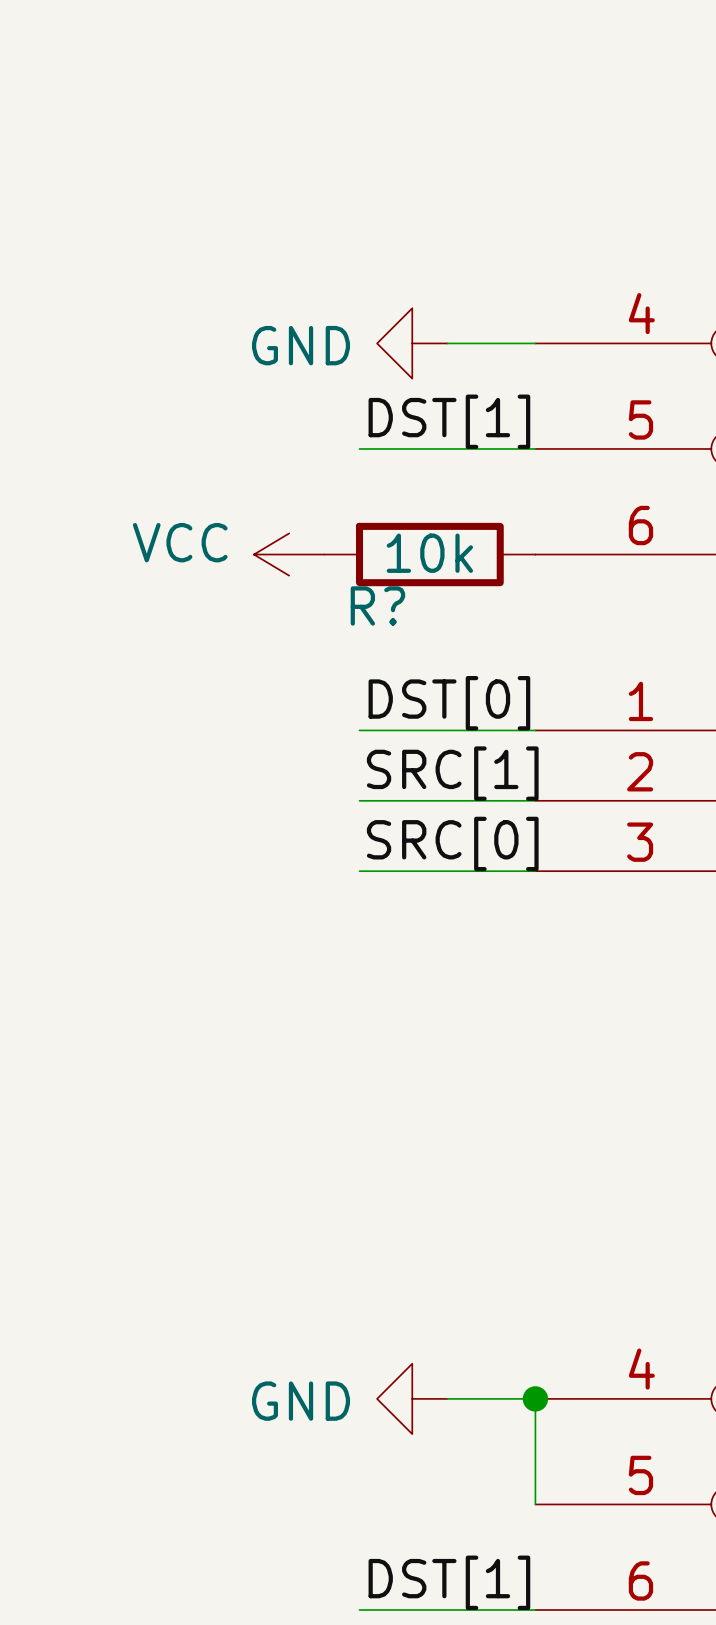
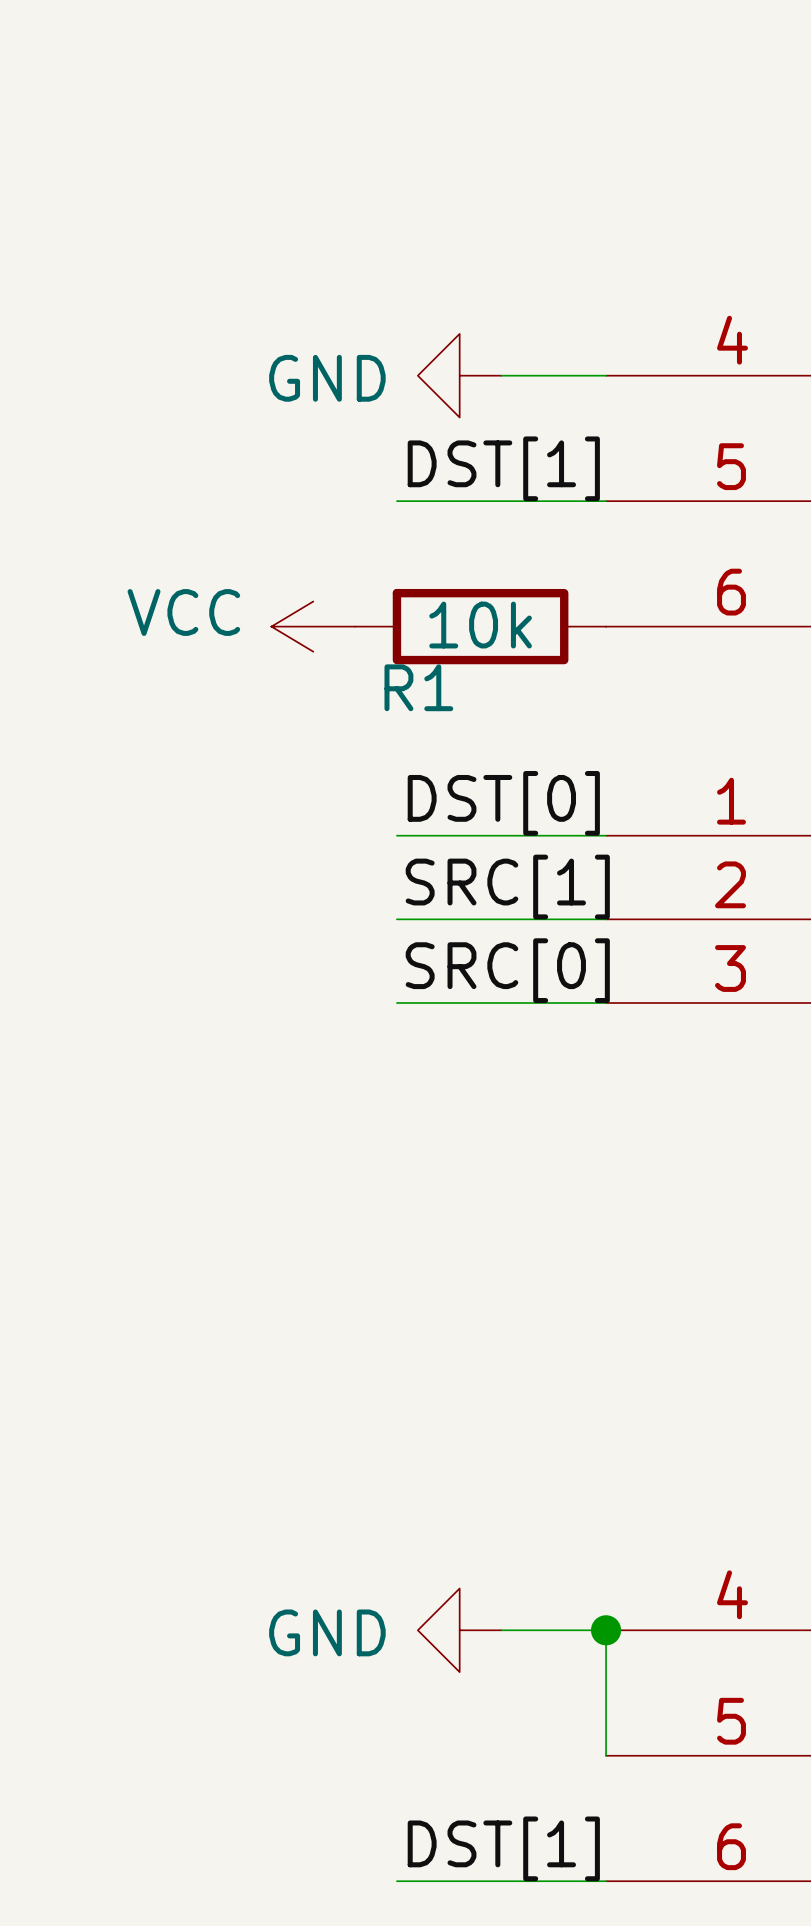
R? name: R? (377, 605) -> R1 (418, 687)

